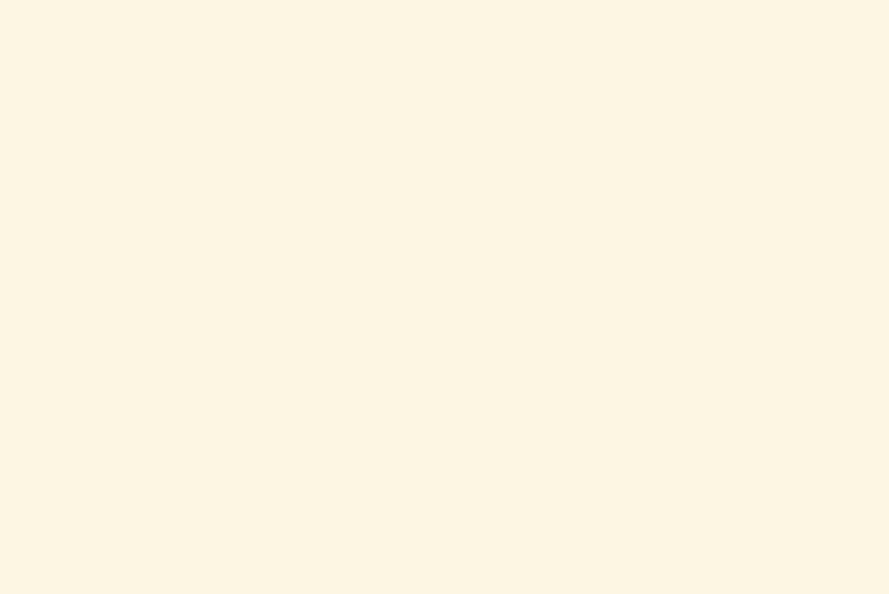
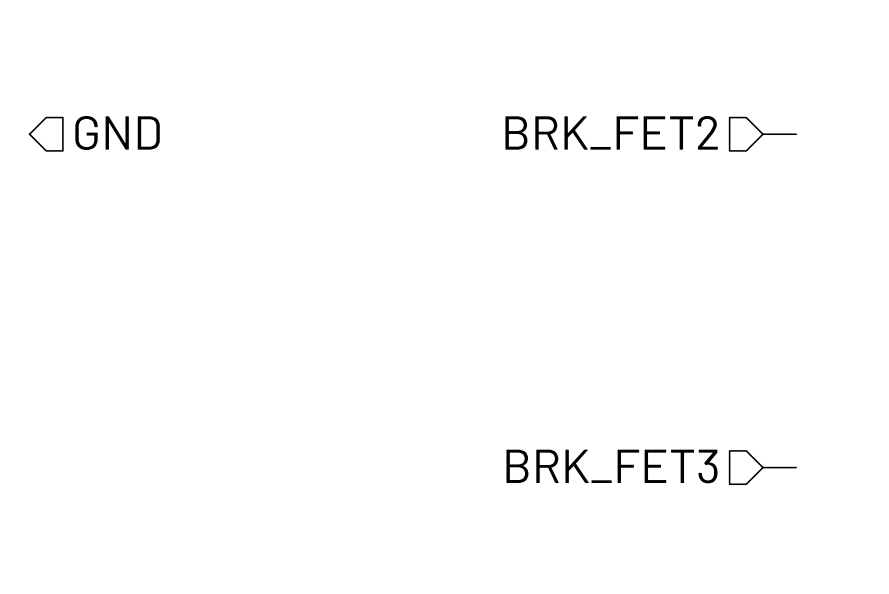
hierarchical label: none -> GND (117, 132)
wire: none -> (762, 134) (796, 134)
hierarchical label: none -> BRK_FET2 (611, 132)
wire: none -> (762, 467) (796, 467)
hierarchical label: none -> BRK_FET3 (611, 466)

